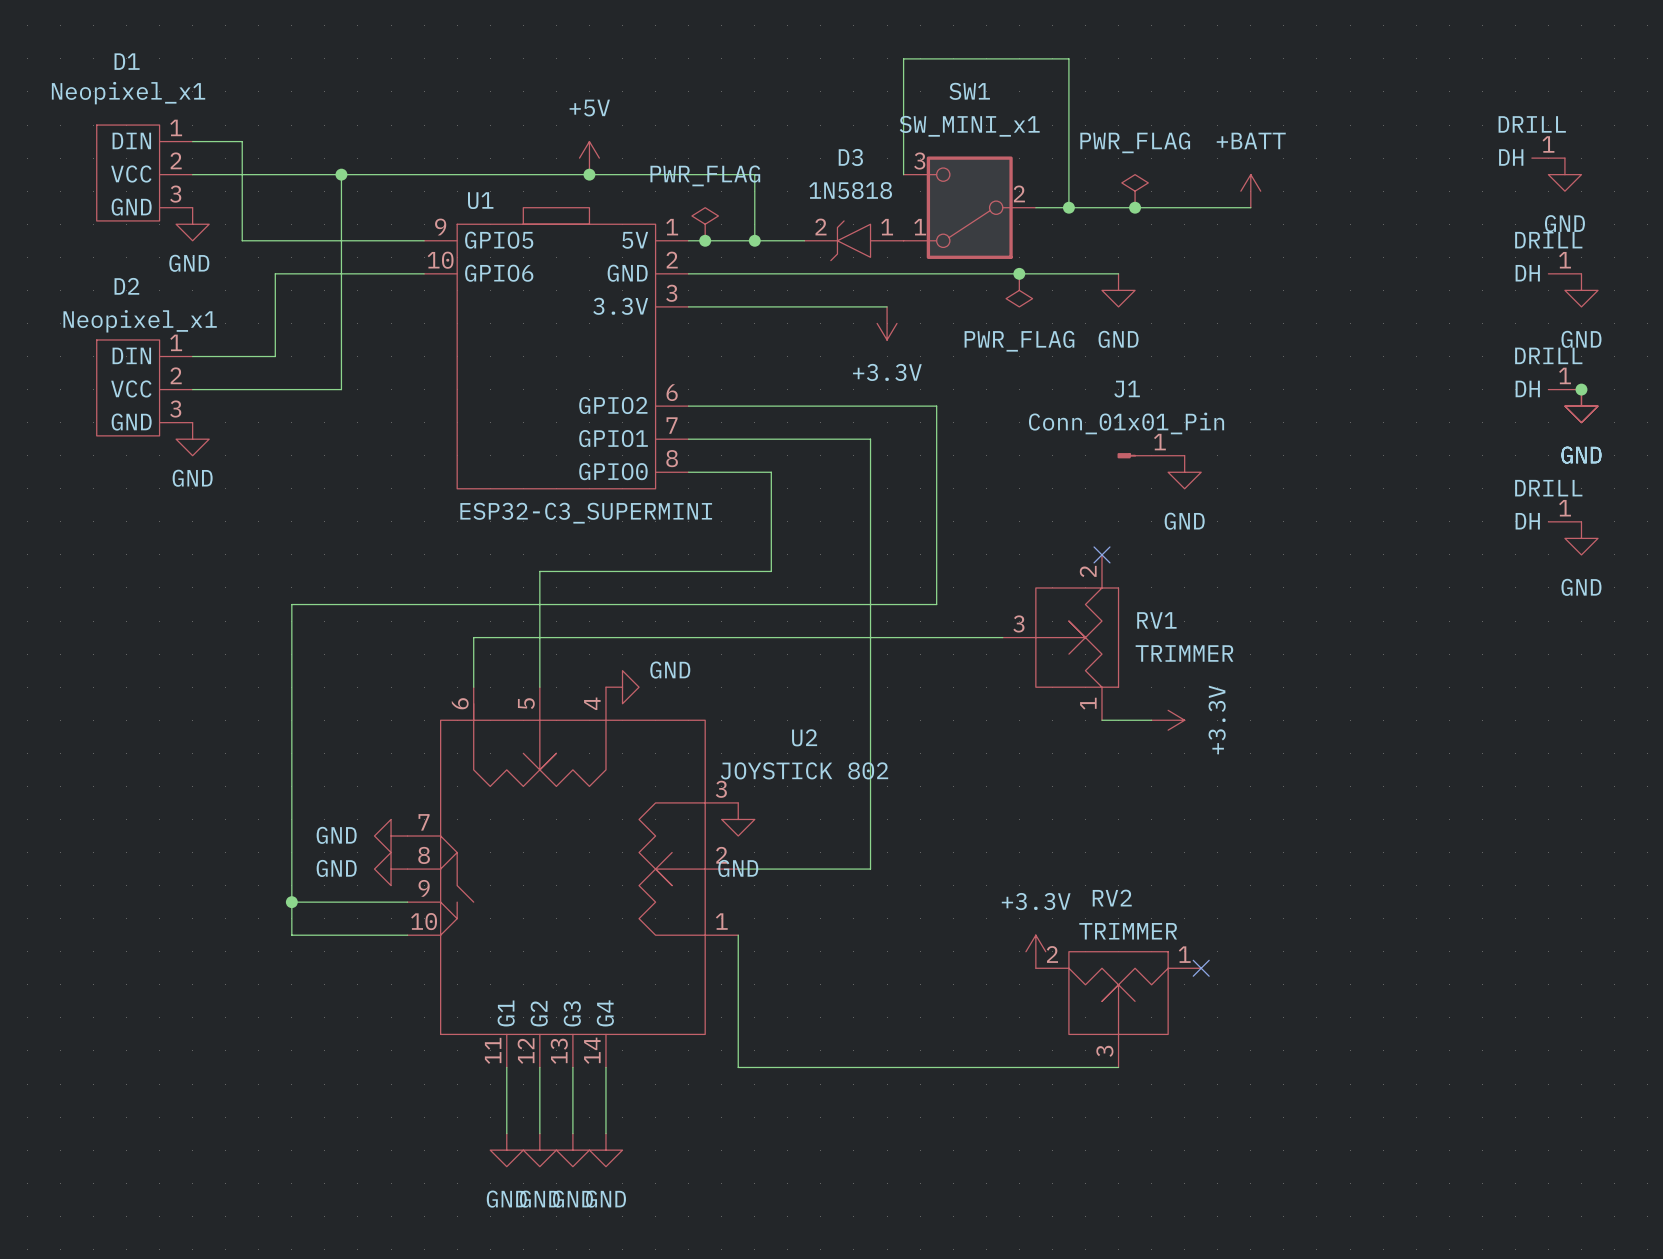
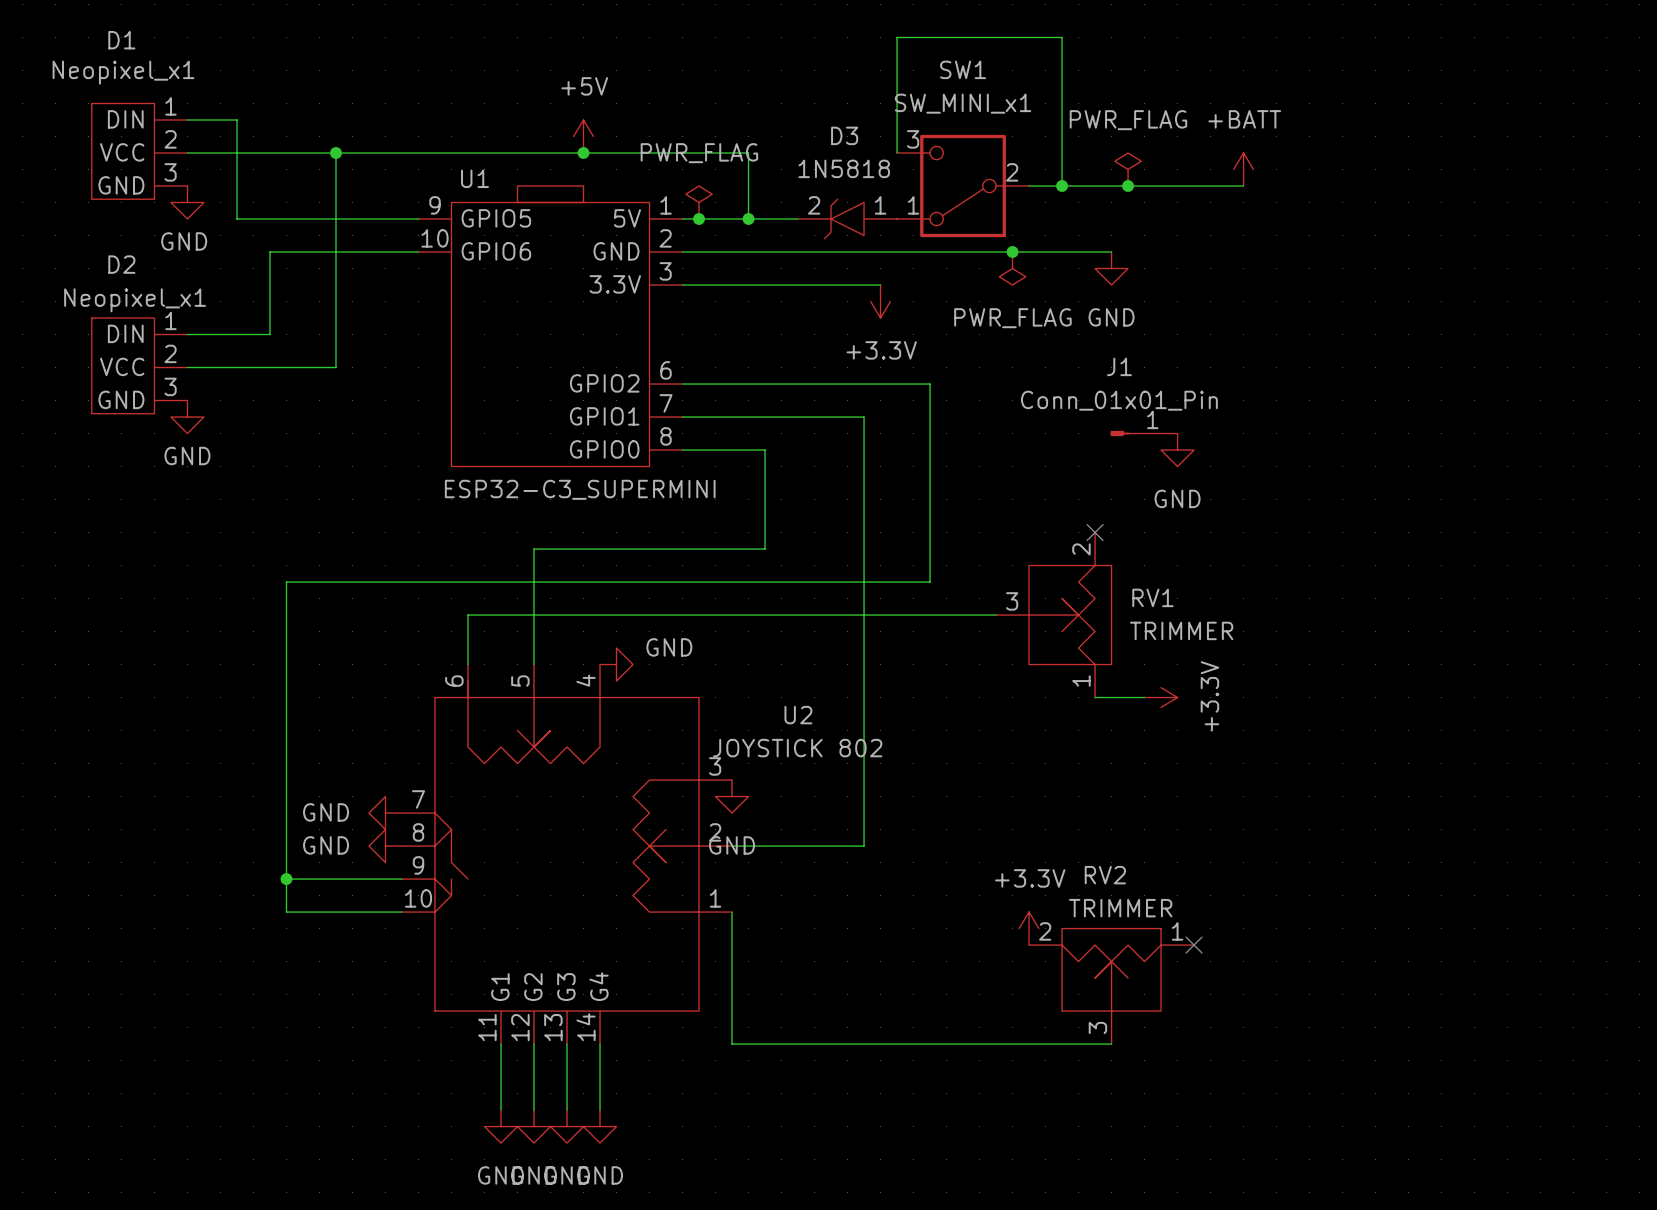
part: DRILL (1548, 158) -> none
power symbol: GND (1564, 174) -> none
part: DRILL (1564, 273) -> none
power symbol: GND (1581, 290) -> none
part: DRILL (1564, 389) -> none
junction: (1581, 389) -> none
power symbol: GND (1581, 406) -> none
part: DRILL (1564, 521) -> none
power symbol: GND (1581, 538) -> none

